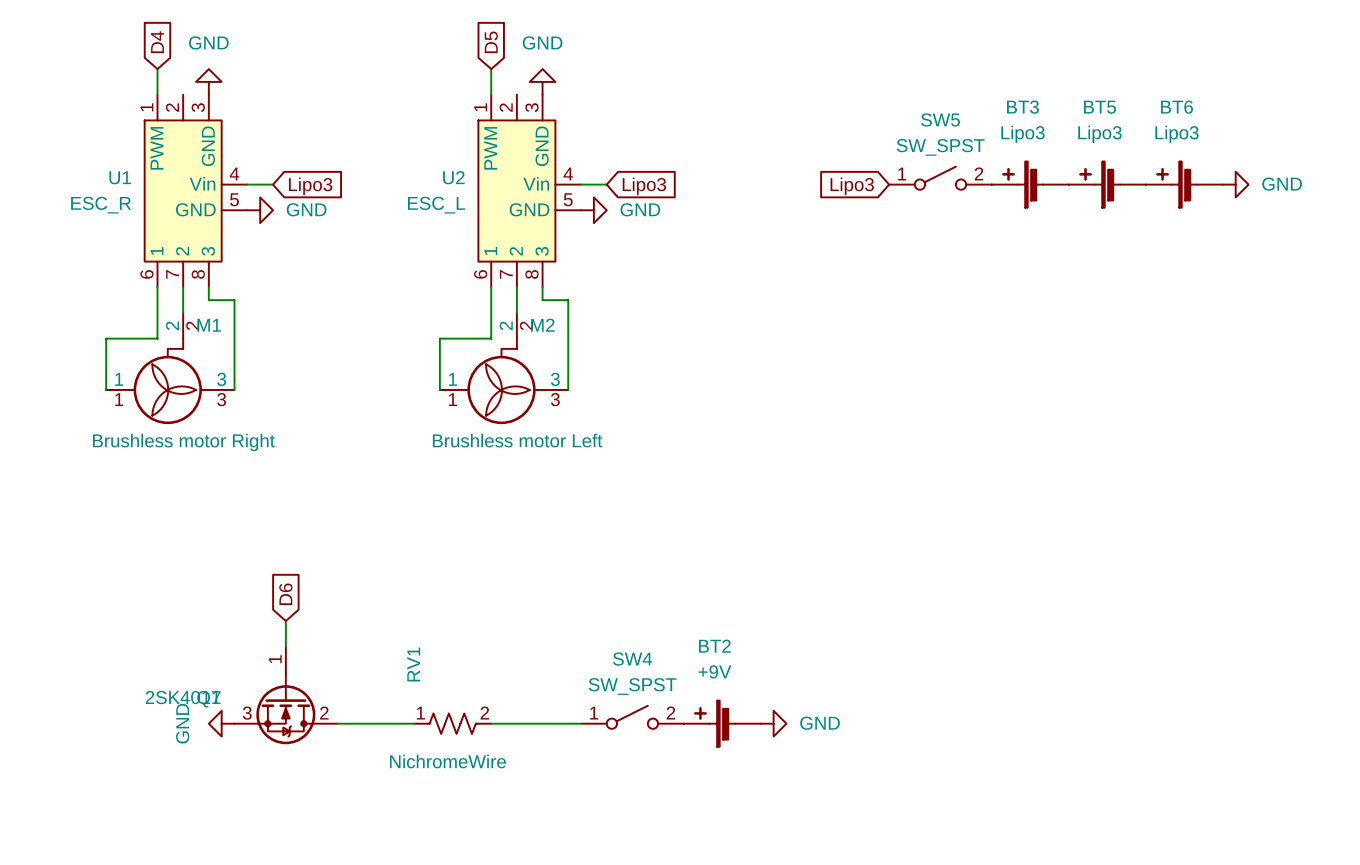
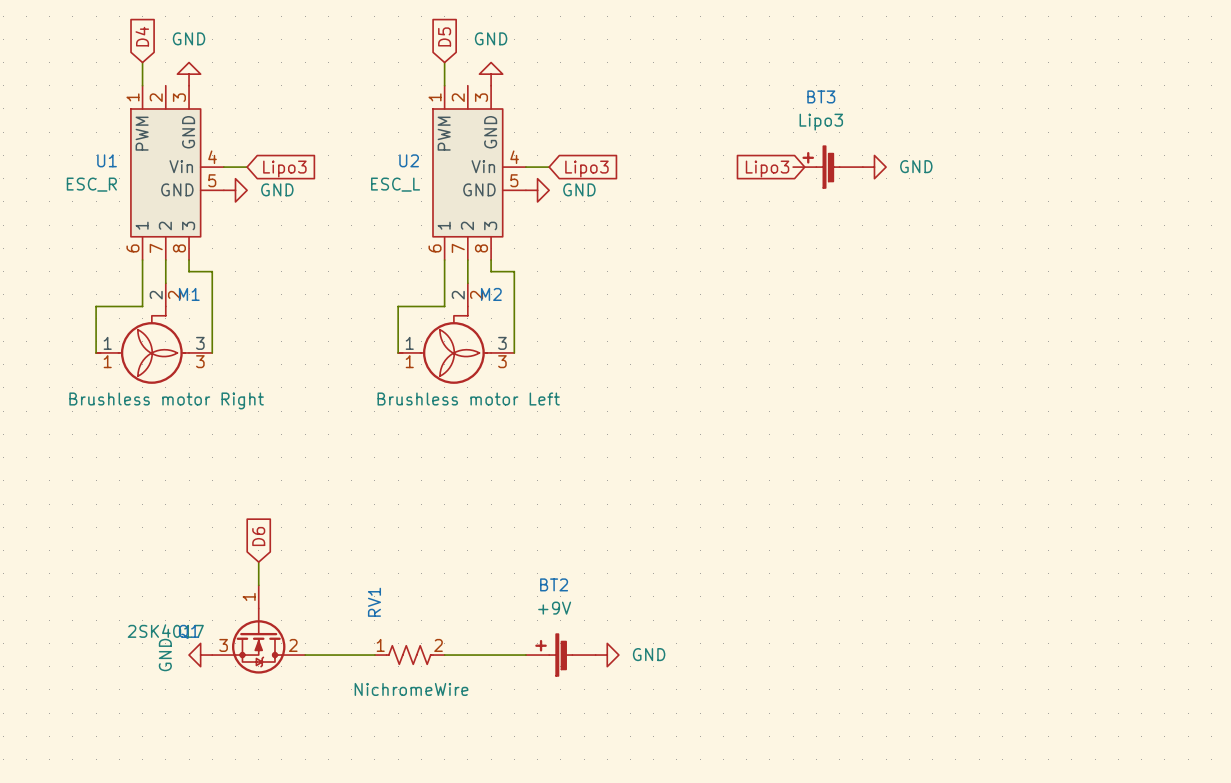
SW5: SW_SPST (940, 178) -> none
power symbol: none -> GND (874, 167)
BT3 position: (1030, 184) -> (827, 167)
BT5: Lipo3 (1107, 184) -> none
BT6: Lipo3 (1184, 184) -> none
power symbol: GND (1235, 184) -> none
SW4: SW_SPST (632, 717) -> none
BT2 position: (722, 723) -> (560, 655)
power symbol position: GND (773, 723) -> GND (607, 655)

